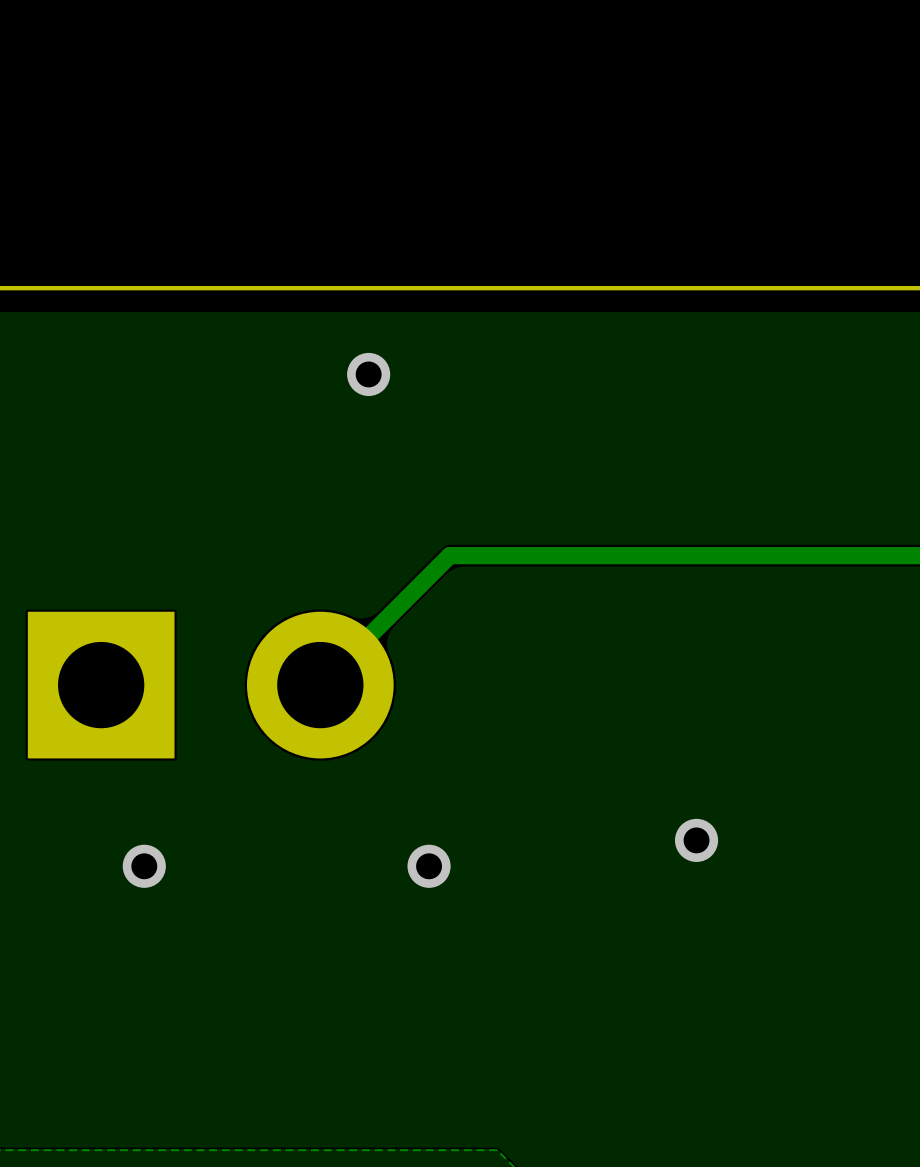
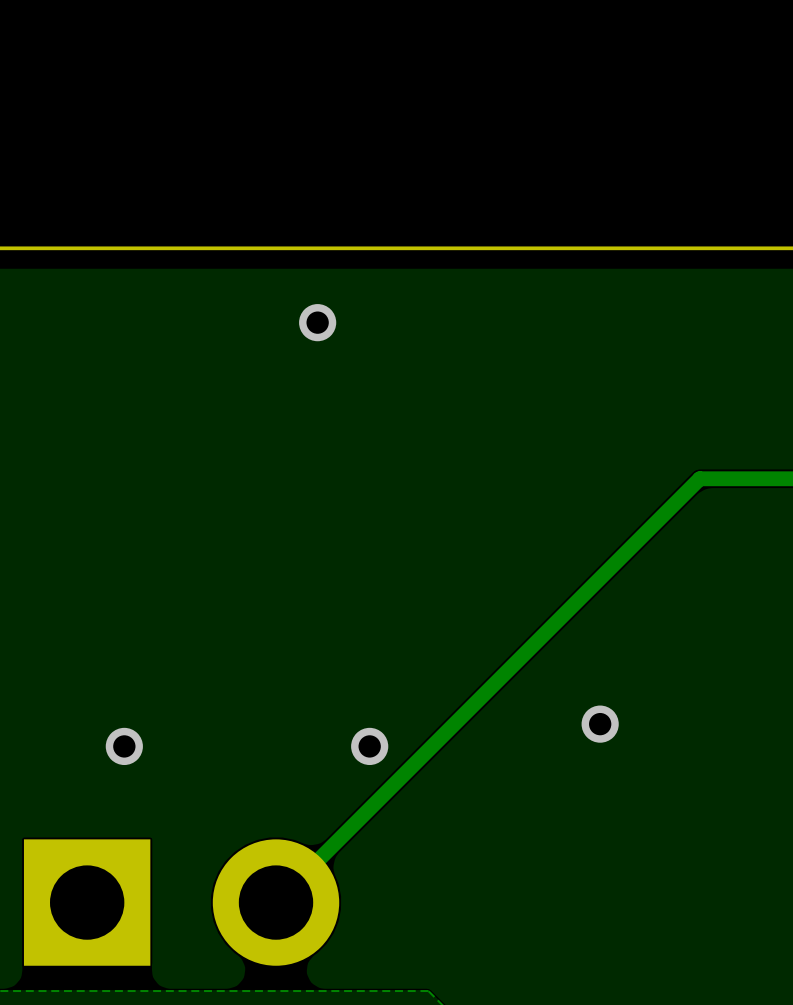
track: (812, 555) (449, 555) (320, 685) -> (699, 478) (276, 902)
part position: (210, 685) -> (181, 902)

